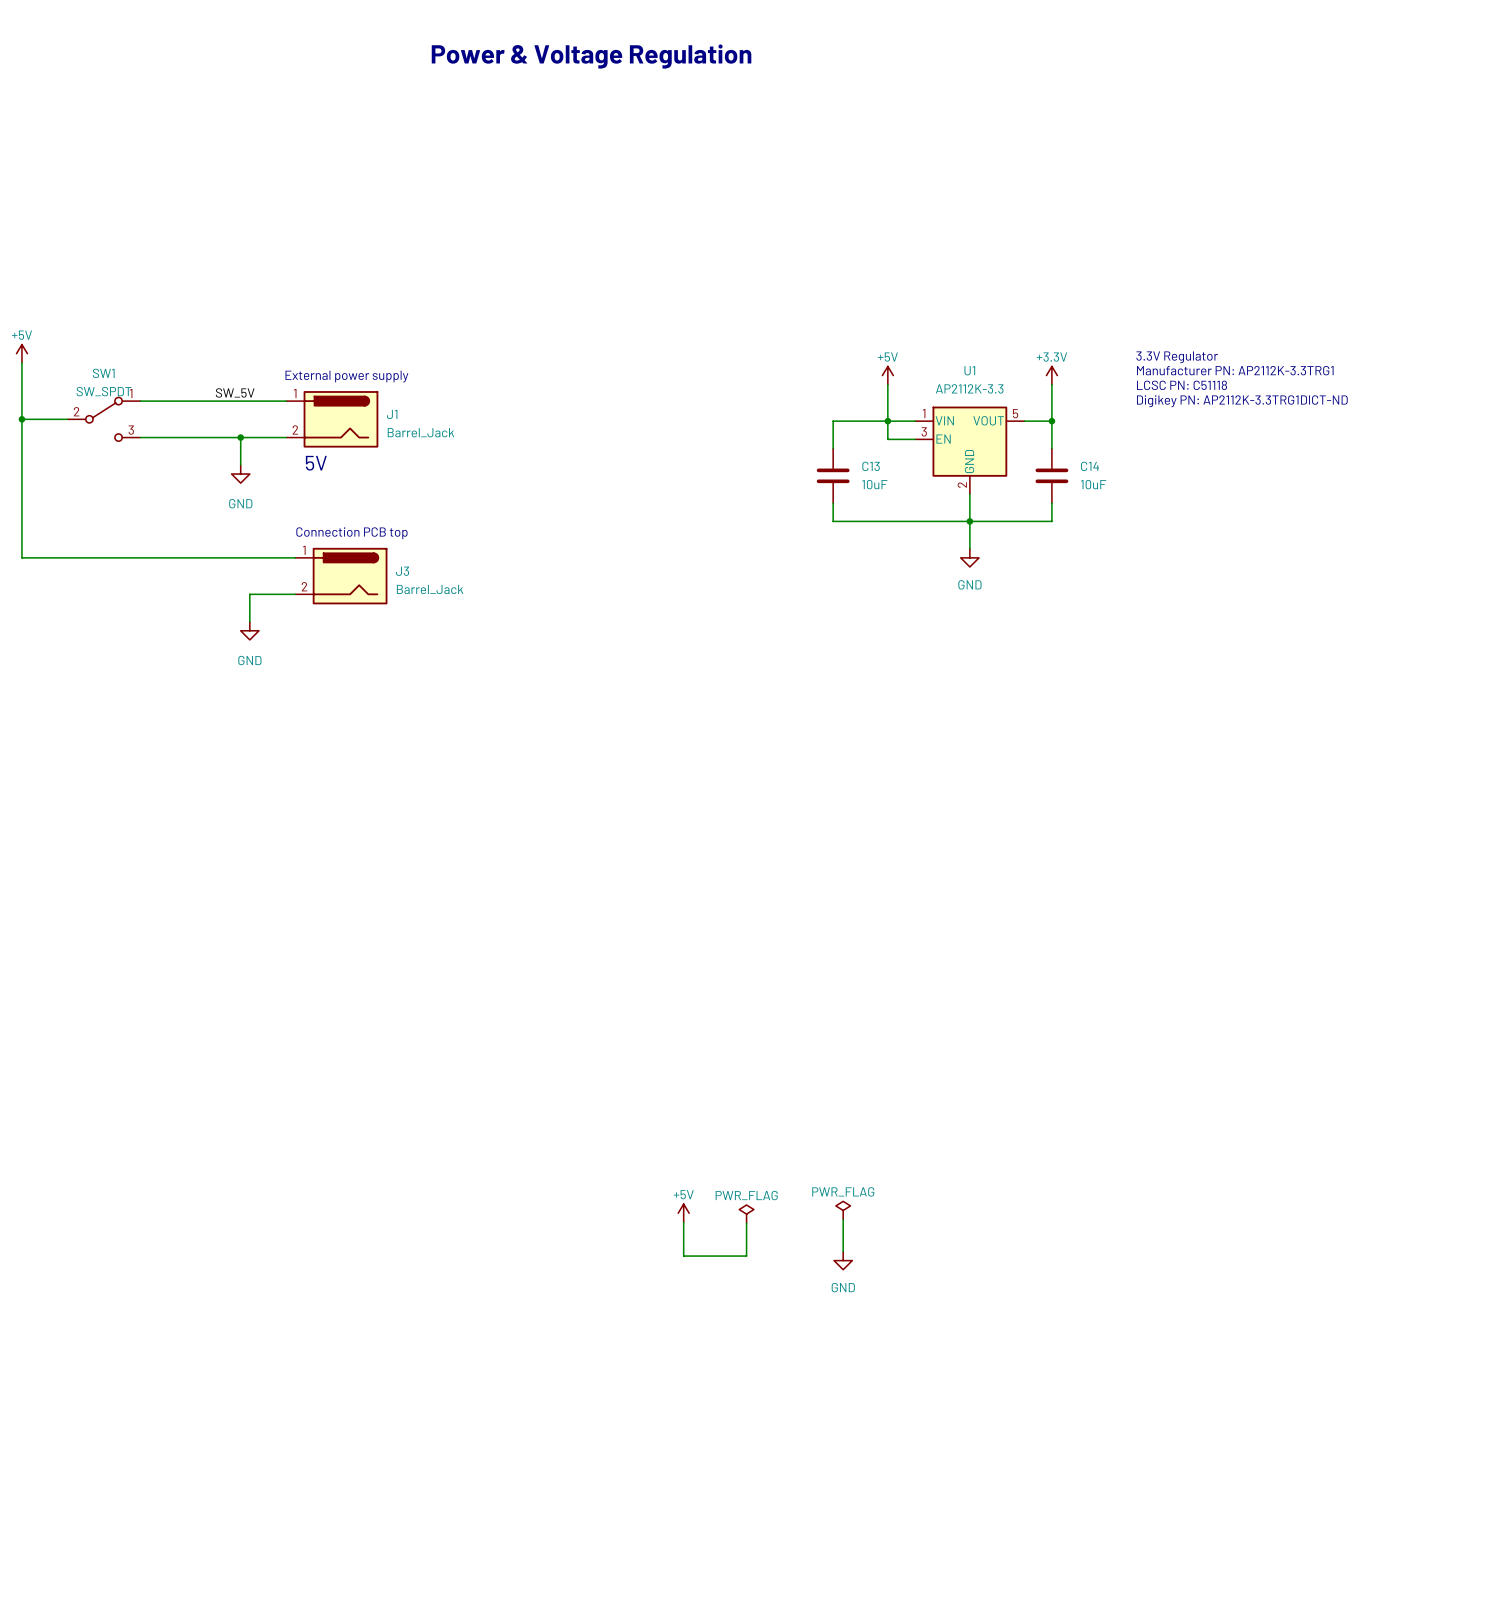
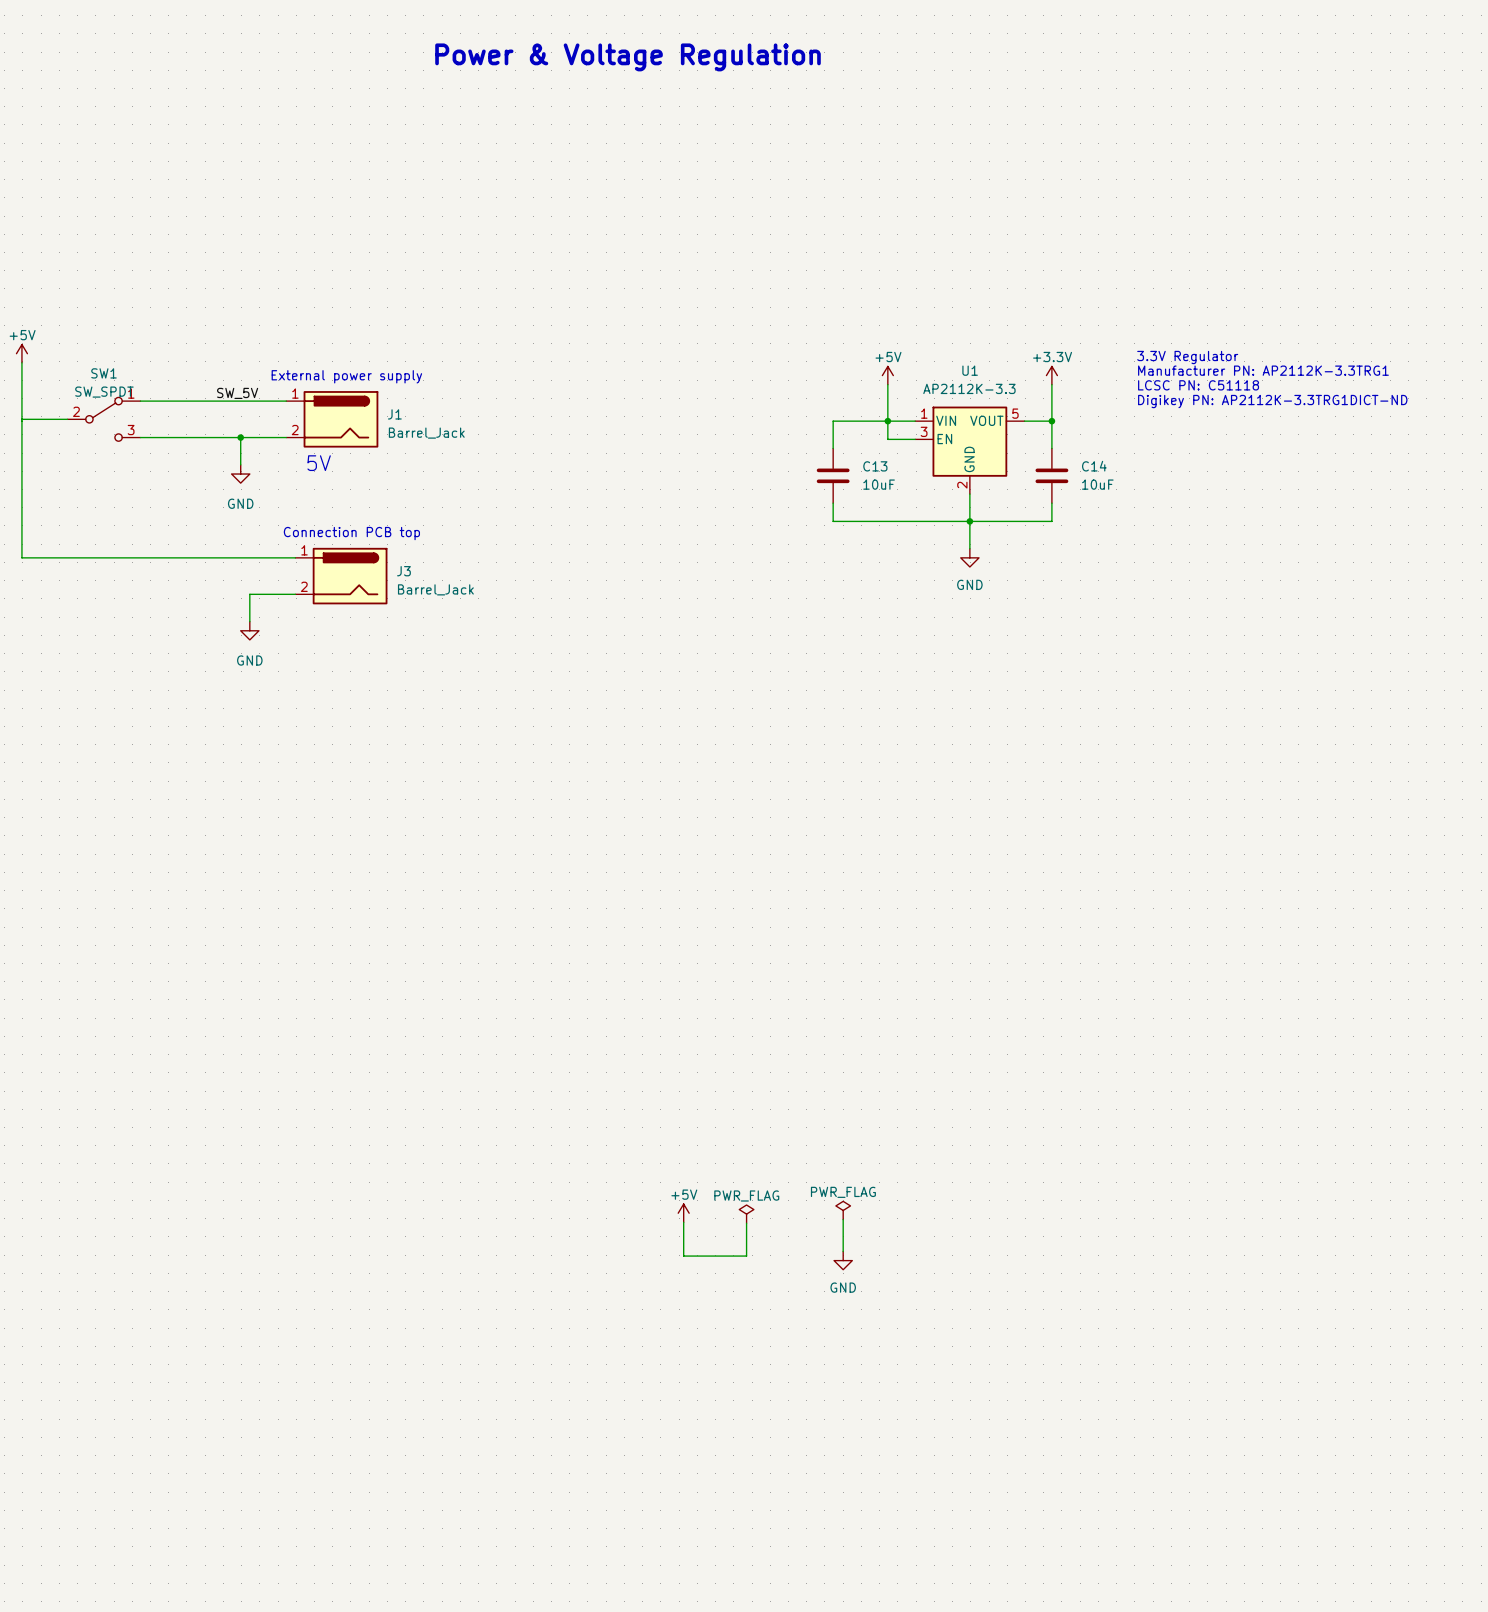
junction: (21, 419) -> none

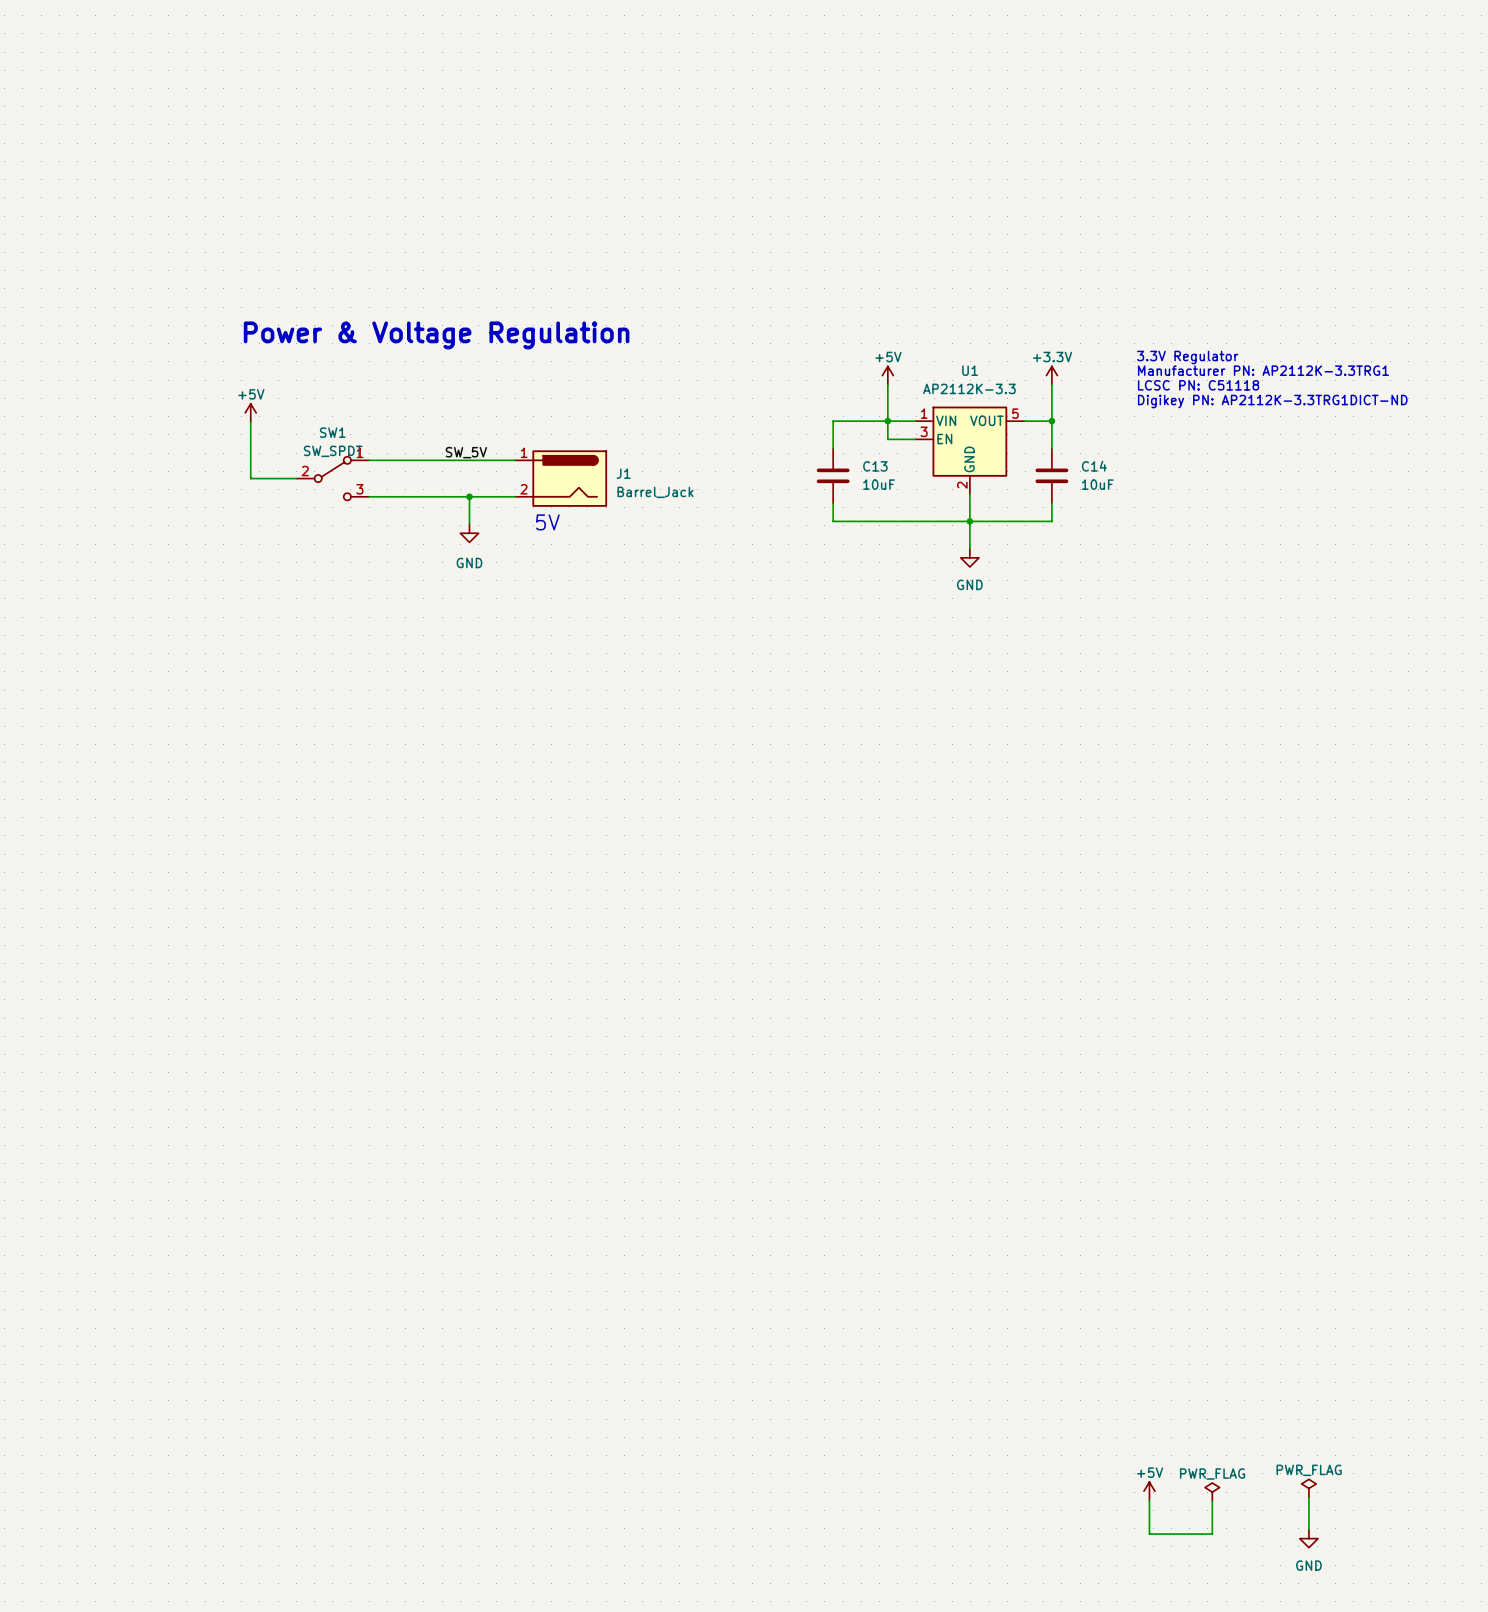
text: Power & Voltage Regulation (628, 57) -> none
text: none -> Power & Voltage Regulation (436, 335)
power symbol: +5V (21, 353) -> none
wire: (21, 362) (21, 557) (295, 557) -> none
text: External power supply (346, 376) -> none
label: SW_5V (237, 393) -> none
wire: (140, 401) (286, 401) -> none
power symbol: none -> +5V (250, 412)
wire: (21, 419) (67, 419) -> none
SW1 position: (103, 419) -> (332, 478)
J1 position: (332, 419) -> (561, 478)
wire: none -> (250, 422) (250, 478) (296, 478)
wire: (140, 437) (286, 437) -> none
wire: (240, 437) (240, 464) -> none
junction: (240, 437) -> none
label: none -> SW_5V (466, 452)
wire: none -> (369, 460) (515, 460)
text: 5V (319, 463) -> none
power symbol: GND (240, 474) -> none
wire: none -> (369, 496) (515, 496)
wire: none -> (469, 496) (469, 524)
junction: none -> (469, 496)
text: none -> 5V (547, 522)
text: Connection PCB top (351, 533) -> none
power symbol: none -> GND (469, 533)
J3: Barrel_Jack (341, 576) -> none
wire: (295, 594) (249, 594) (249, 621) -> none
power symbol: GND (249, 630) -> none
power symbol: PWR_FLAG (843, 1210) -> none
power symbol: +5V (683, 1213) -> none
power symbol: PWR_FLAG (746, 1214) -> none
wire: (843, 1219) (843, 1251) -> none
wire: (683, 1222) (683, 1256) (746, 1256) (746, 1223) -> none
power symbol: GND (843, 1260) -> none
power symbol: none -> PWR_FLAG (1308, 1488)
power symbol: none -> +5V (1149, 1491)
power symbol: none -> PWR_FLAG (1212, 1492)
wire: none -> (1308, 1497) (1308, 1529)
wire: none -> (1149, 1500) (1149, 1534) (1212, 1534) (1212, 1501)
power symbol: none -> GND (1308, 1538)

